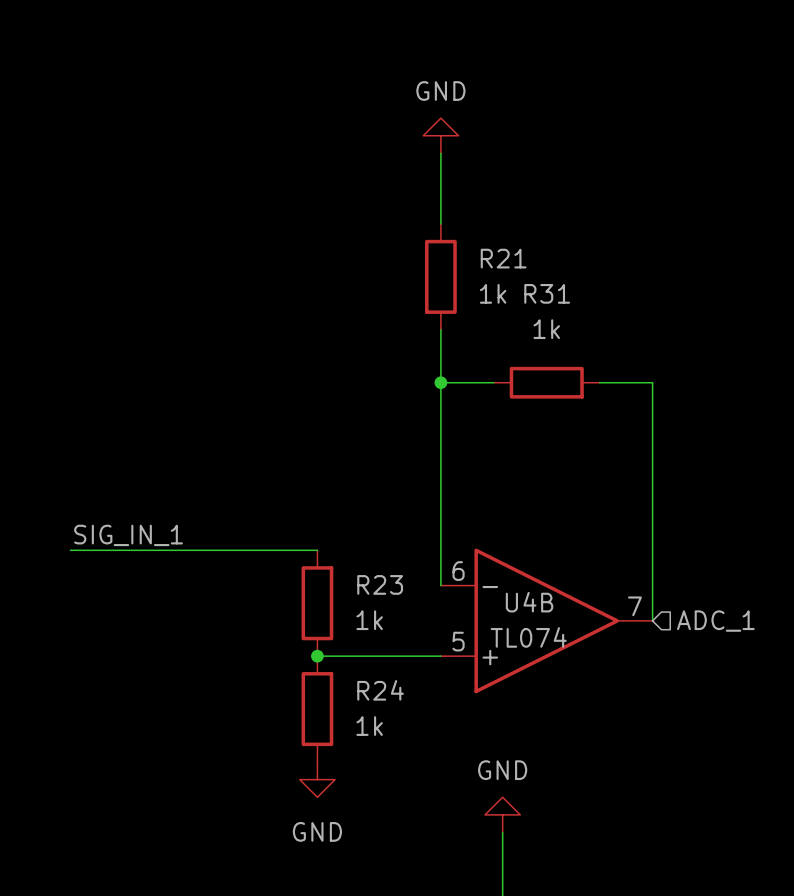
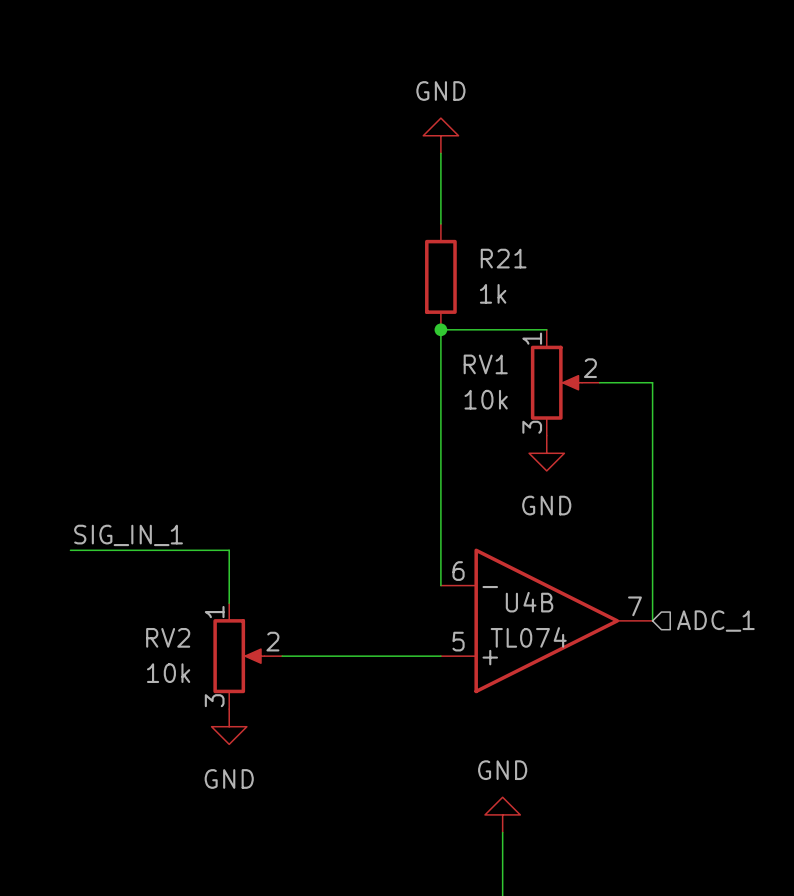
wire: none -> (440, 329) (546, 329)
wire: (440, 382) (493, 382) -> none
junction position: (440, 382) -> (440, 329)
R31: 1k (546, 382) -> none
RV1: none -> 10k (565, 382)
power symbol: none -> GND (546, 453)
wire: (229, 550) (317, 550) -> (229, 550) (229, 603)
R23: 1k (317, 603) -> none
RV2: none -> 10k (247, 656)
wire: none -> (282, 656) (317, 656)
junction: (317, 656) -> none
R24: 1k (317, 709) -> none
power symbol position: GND (317, 779) -> GND (229, 726)

